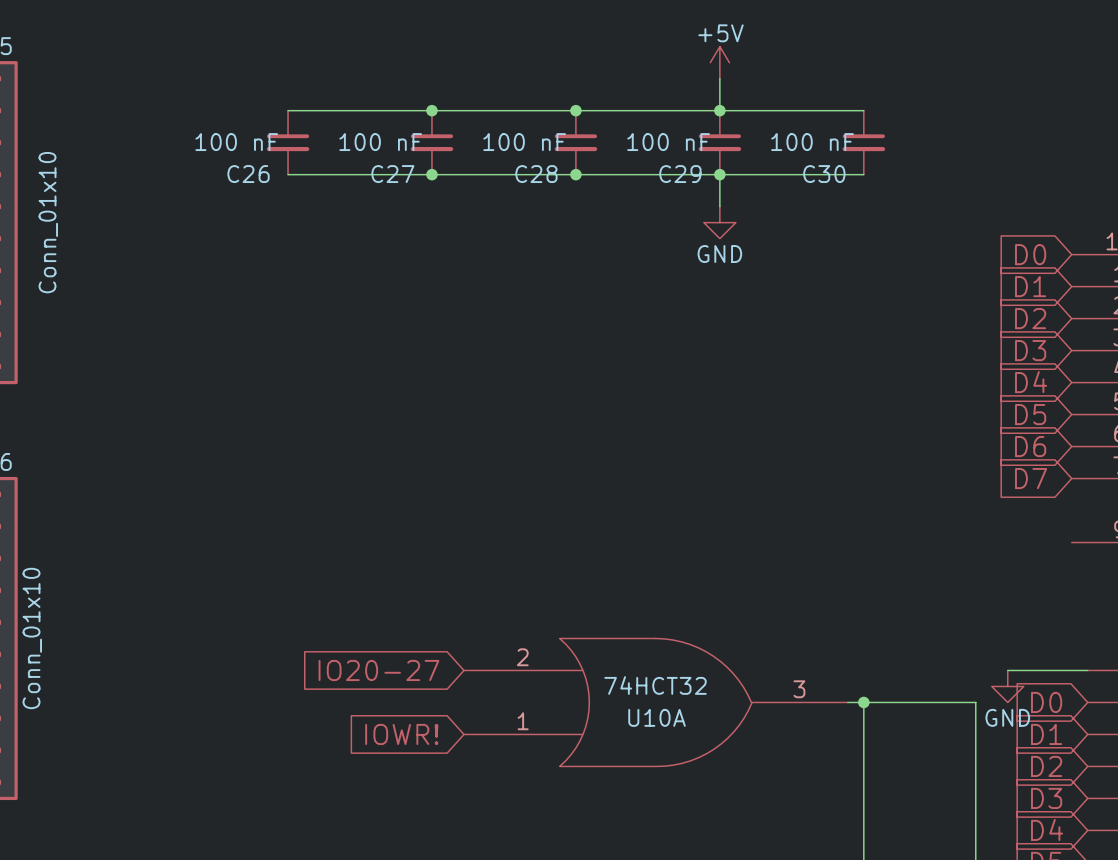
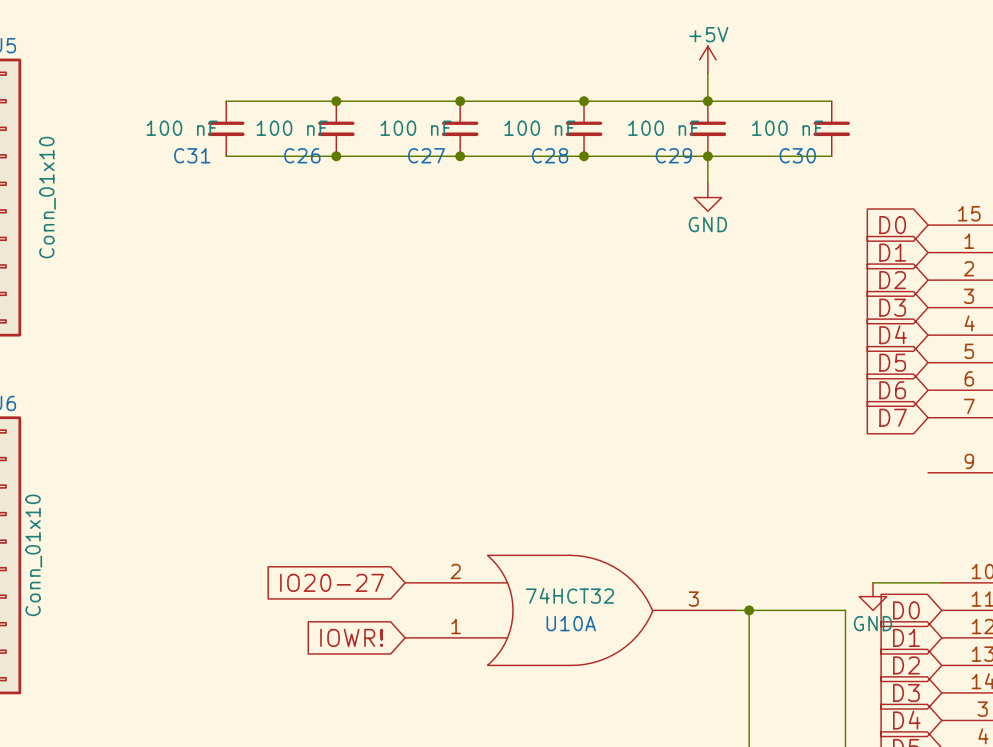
power symbol position: +5V (719, 62) -> +5V (707, 59)
wire: (719, 78) (719, 110) -> (707, 73) (707, 101)
wire: none -> (226, 101) (253, 101)
junction: none -> (336, 101)
junction: (431, 110) -> none
junction: none -> (460, 101)
junction: (575, 110) -> none
junction: none -> (584, 101)
junction: (719, 110) -> none
junction: none -> (707, 101)
wire: none -> (749, 101) (831, 101)
C31: none -> 100 nF (226, 128)
C26 position: (288, 142) -> (336, 128)
C27 position: (431, 142) -> (460, 128)
C28 position: (575, 142) -> (584, 128)
C29 position: (719, 142) -> (707, 128)
C30 position: (863, 142) -> (831, 128)
wire: none -> (226, 156) (253, 156)
junction: none -> (336, 156)
junction: (431, 174) -> none
junction: none -> (460, 156)
junction: (575, 174) -> none
junction: none -> (584, 156)
wire: (719, 174) (719, 206) -> (707, 156) (707, 183)
junction: (719, 174) -> none
junction: none -> (707, 156)
wire: none -> (749, 156) (831, 156)
power symbol position: GND (719, 222) -> GND (707, 197)

